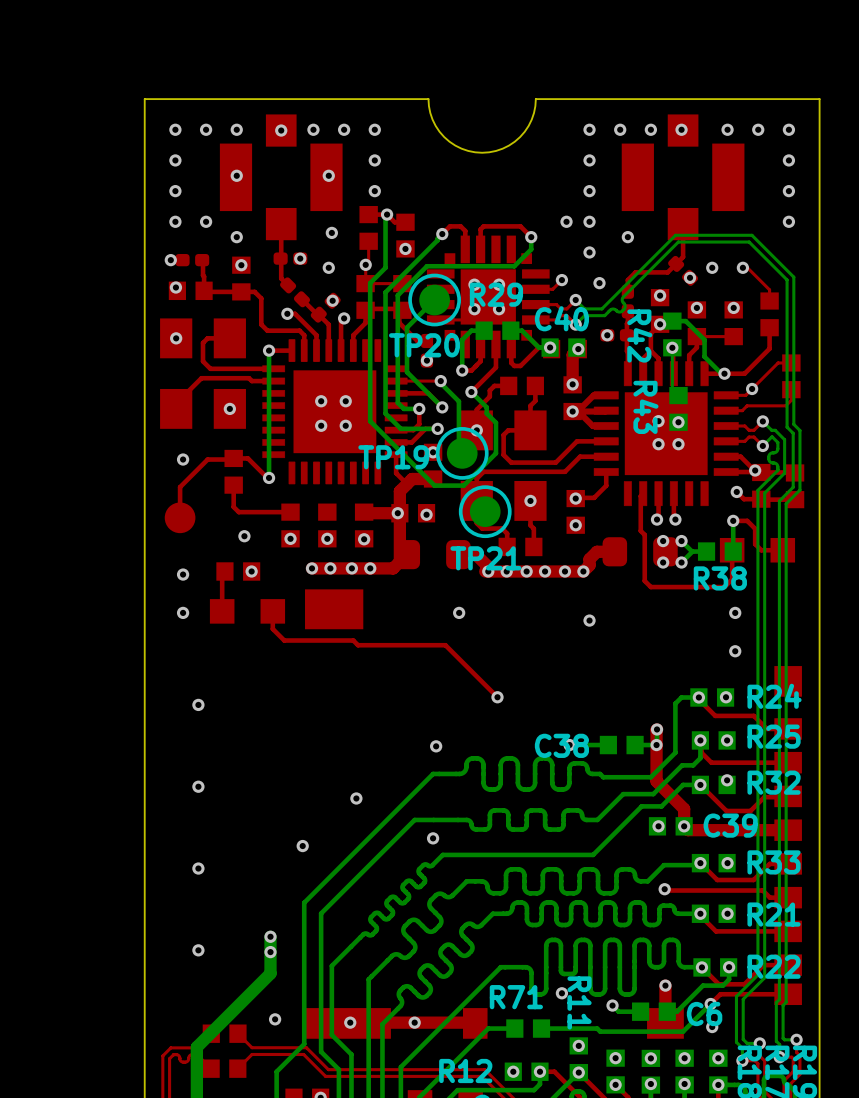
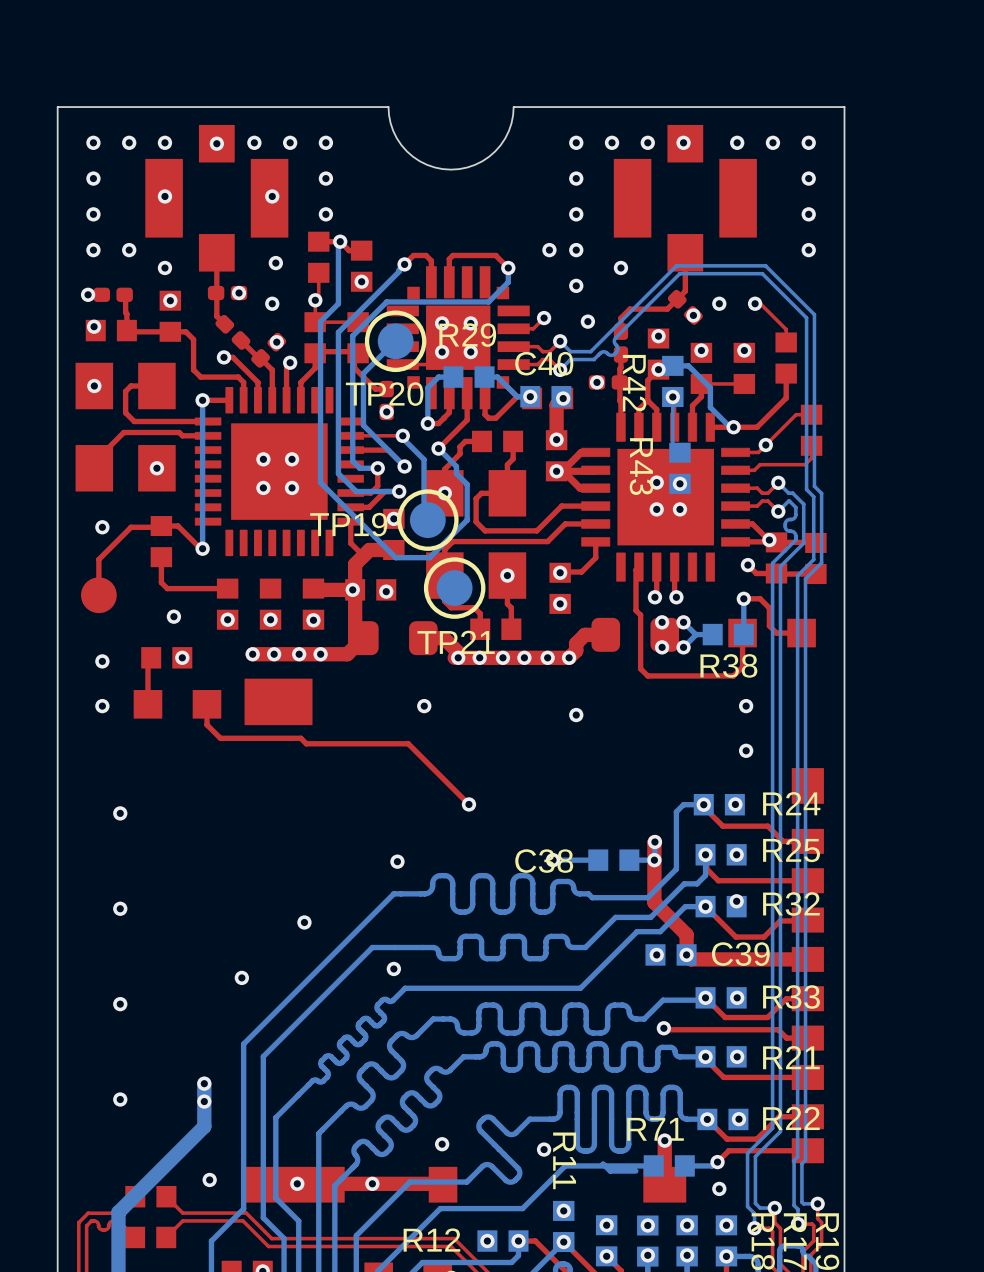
bottom track: (575, 961) (574, 973) (562, 973) (560, 943) (556, 940) (549, 940) (546, 945) (546, 988) (543, 993) (536, 994) (532, 991) (531, 972) (528, 968) (500, 967) (446, 1021) -> (560, 1112) (554, 1119) (529, 1119) (512, 1134) (507, 1133) (490, 1117) (485, 1117) (479, 1122) (480, 1130) (518, 1169) (519, 1175) (513, 1181) (507, 1181) (491, 1165) (487, 1164) (483, 1165) (466, 1182) (409, 1182)
bottom track: (728, 967) (729, 979) (722, 985) (703, 985) (676, 1011) (667, 1011) -> none
bottom track: none -> (717, 1160) (712, 1165) (684, 1165)
bottom track: (710, 1004) (683, 1031) (600, 1031) (597, 1028) (541, 1028) (544, 1031) -> none
via position: (612, 1005) -> (442, 1144)
C6: (653, 1011) -> none
bottom track: (514, 1028) (488, 1028) (472, 1043) -> (653, 1165) (565, 1165) (522, 1208) (440, 1208)
R71 position: (528, 1028) -> (669, 1165)

